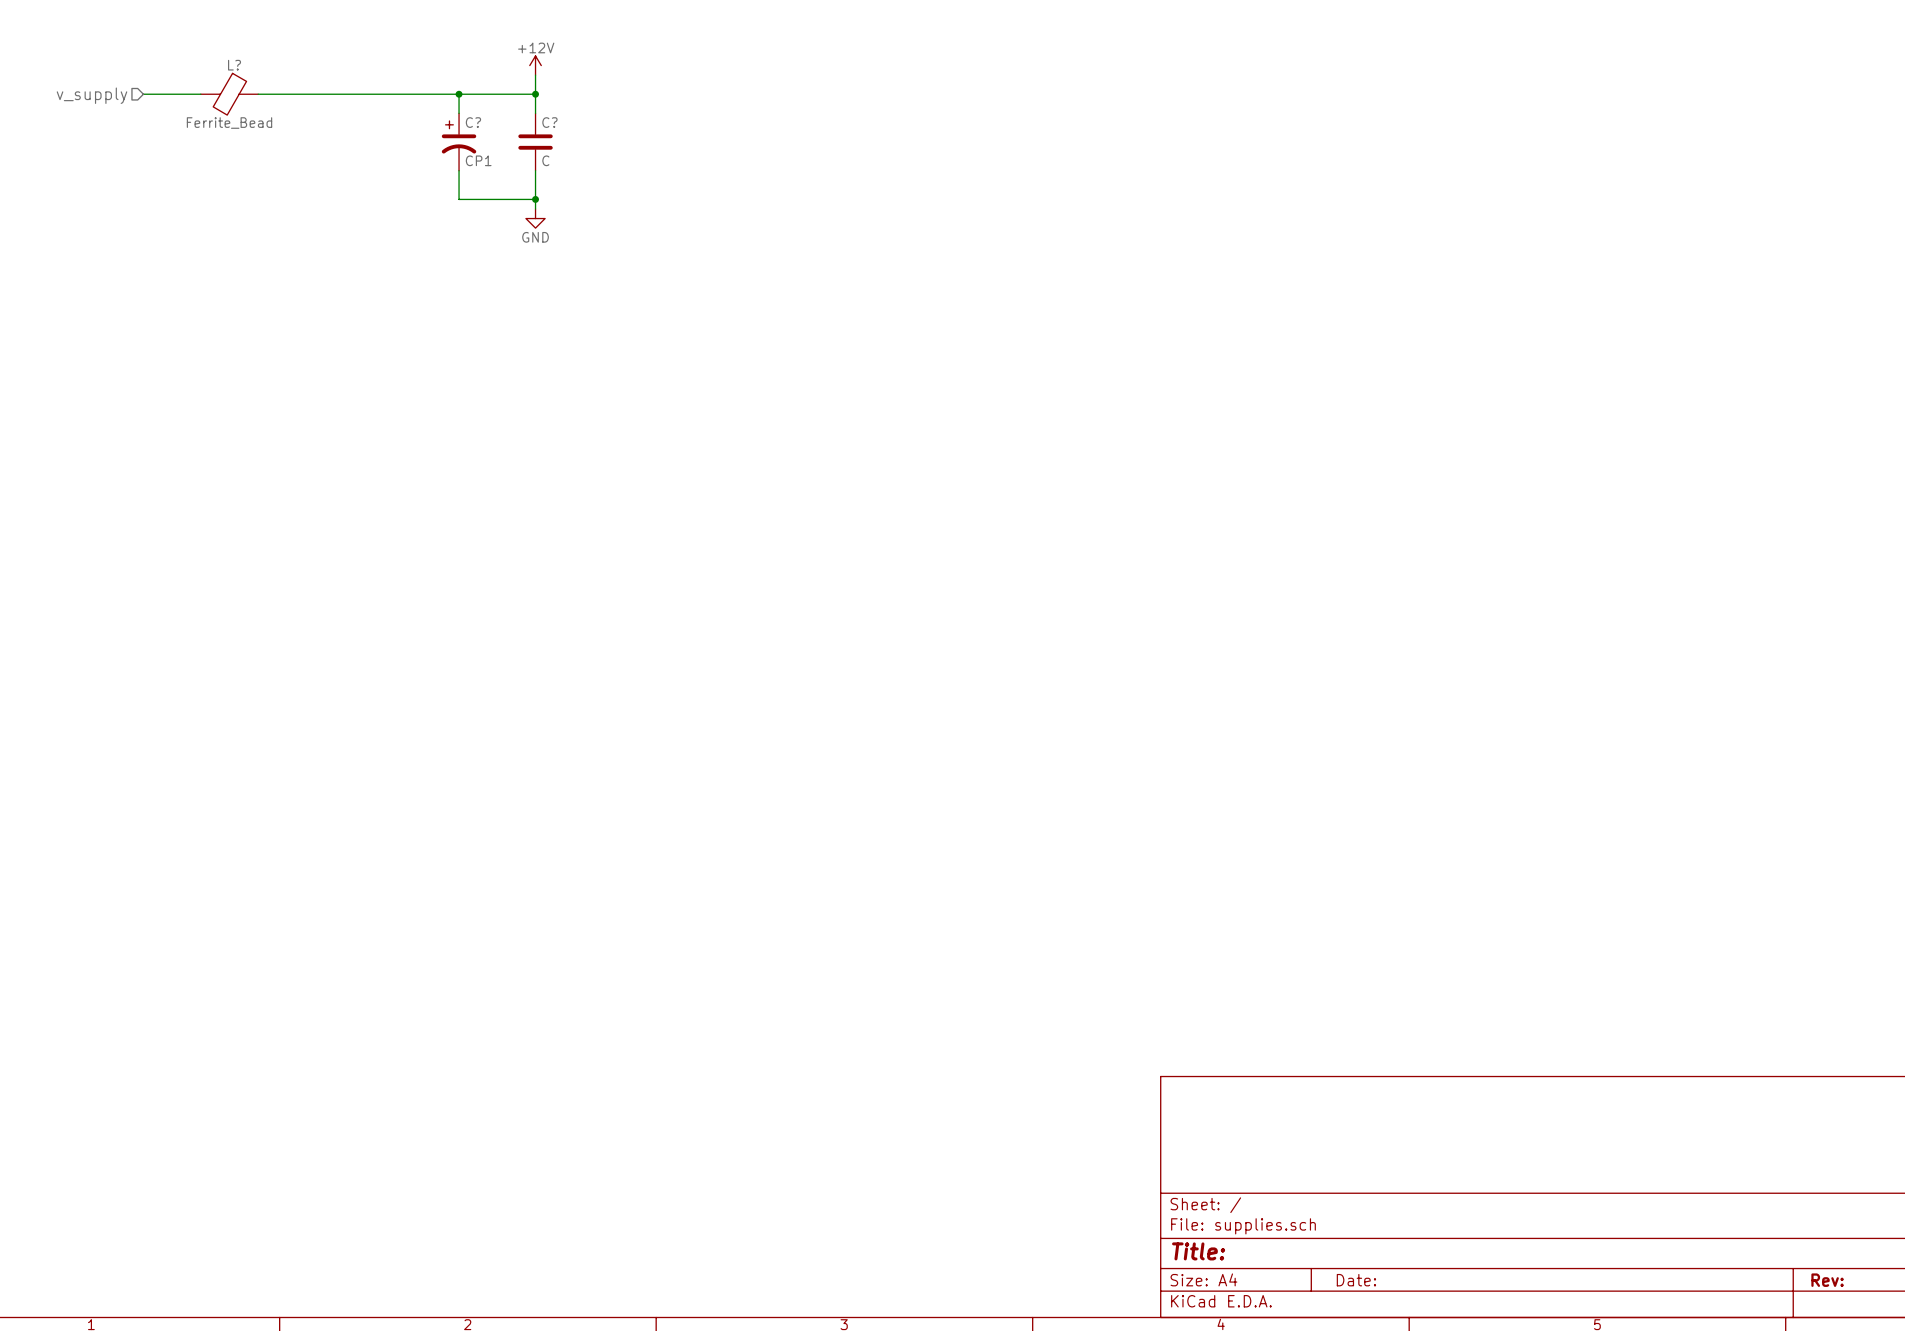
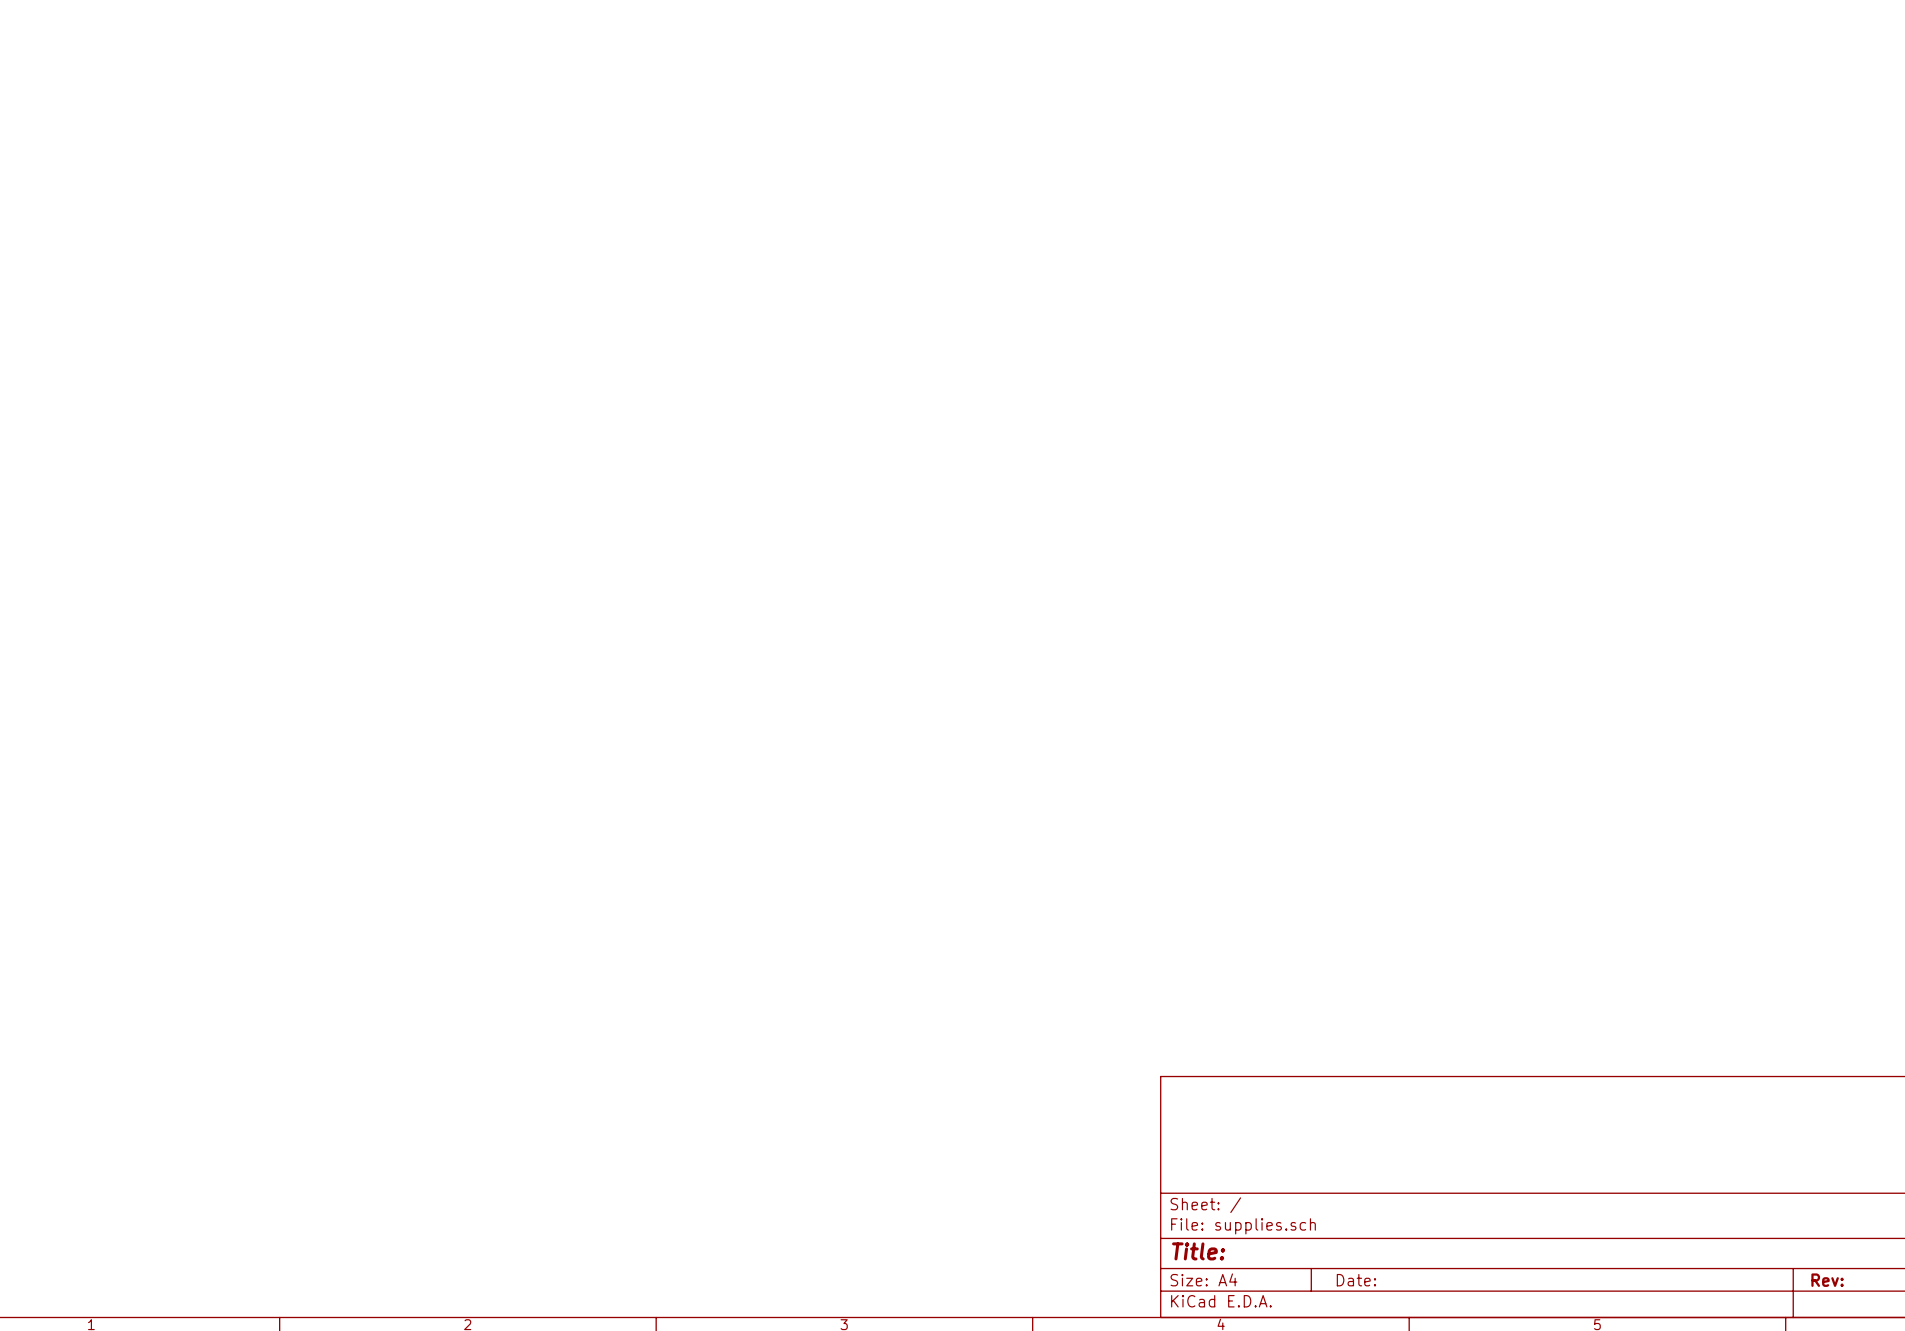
power symbol: +12V (535, 65) -> none
wire: (535, 75) (535, 113) -> none
wire: (143, 94) (200, 94) -> none
L?: Ferrite_Bead (229, 94) -> none
wire: (258, 94) (535, 94) -> none
wire: (459, 94) (459, 113) -> none
junction: (459, 94) -> none
junction: (535, 94) -> none
hierarchical label: v_supply (91, 95) -> none
C?: CP1 (459, 142) -> none
C?: C (535, 142) -> none
wire: (459, 170) (459, 199) (535, 199) -> none
wire: (535, 170) (535, 208) -> none
junction: (535, 199) -> none
power symbol: GND (535, 218) -> none

